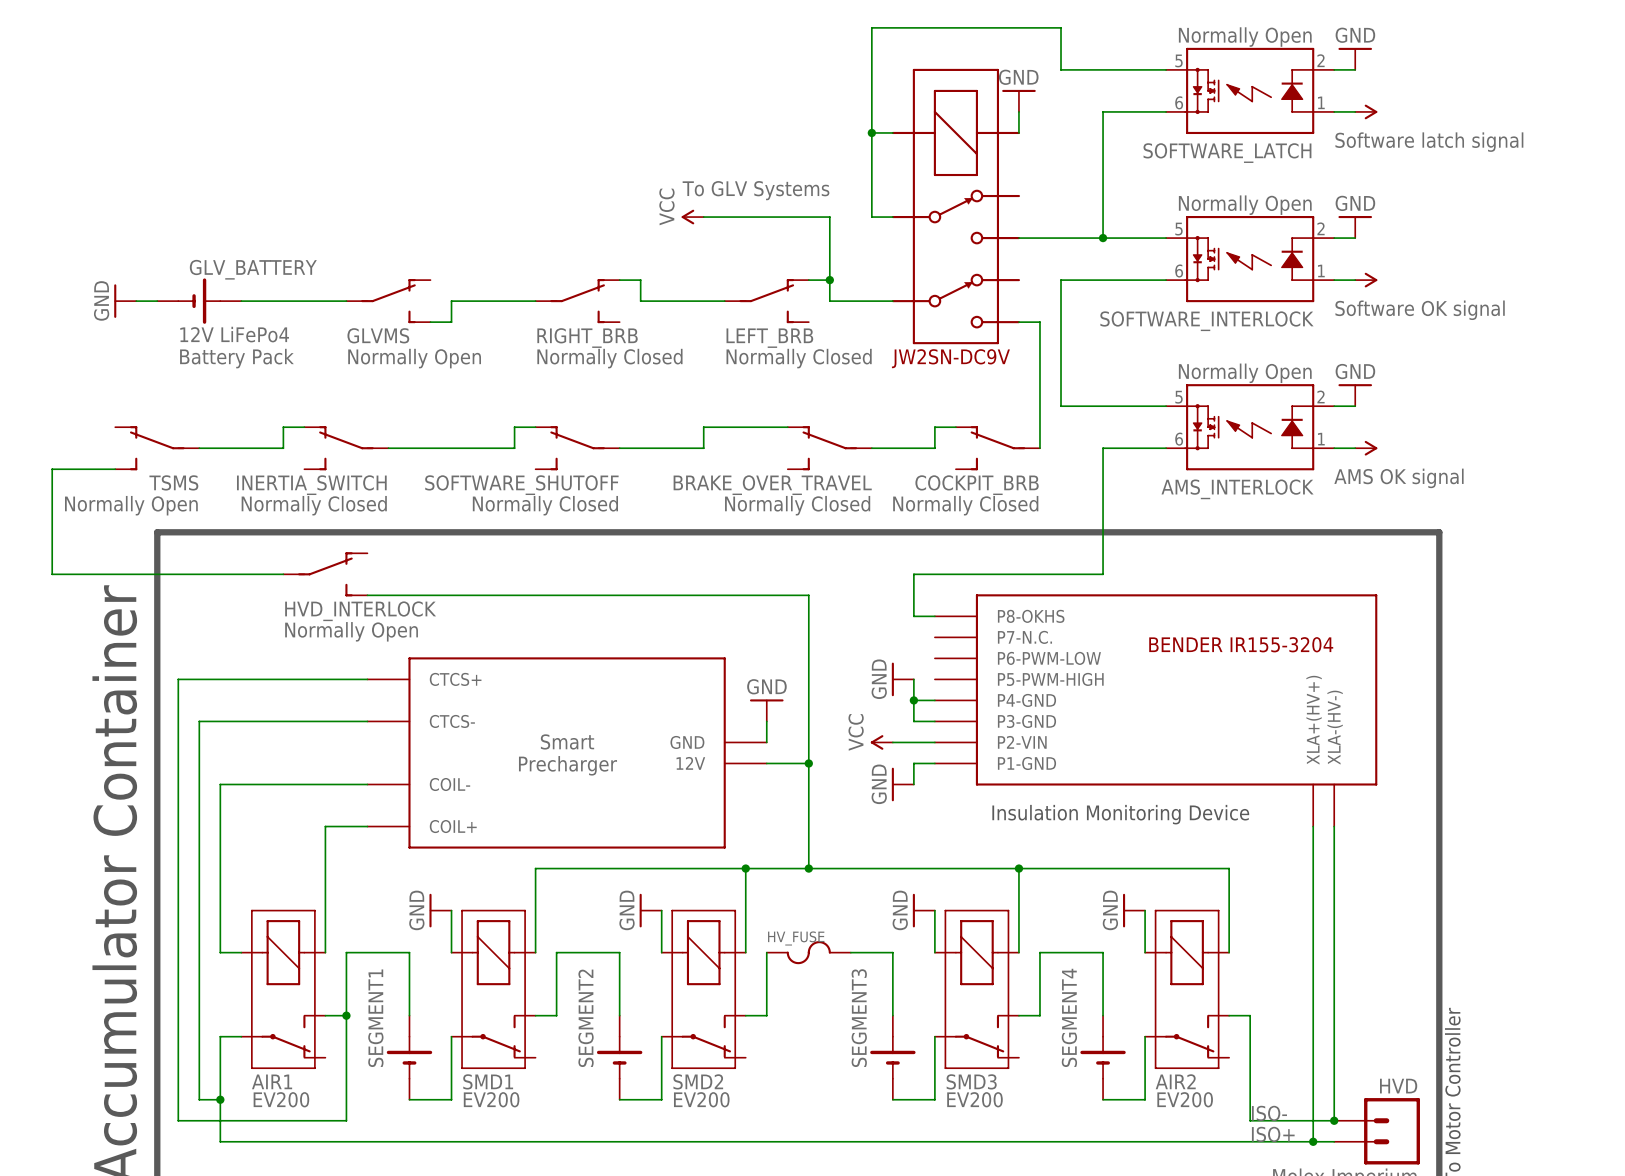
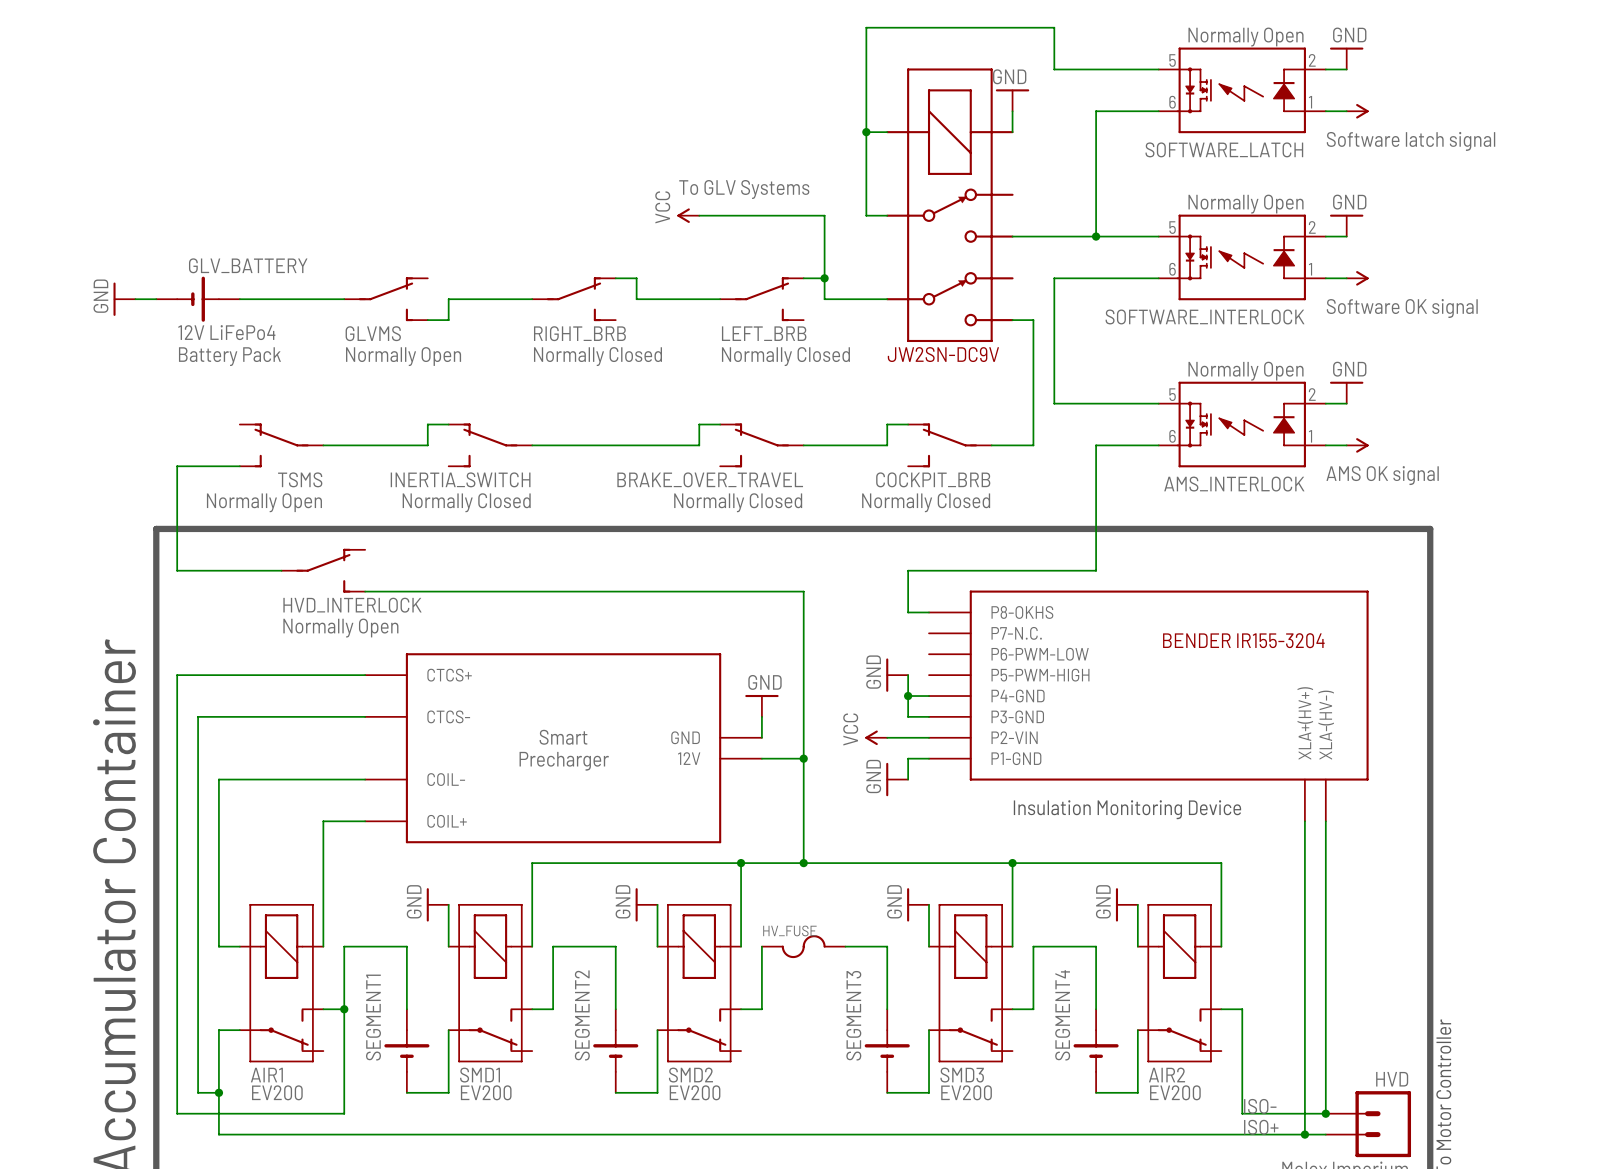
wire: (304, 427) (283, 427) (283, 448) (199, 448) -> none
wire: (535, 427) (514, 427) (514, 448) (430, 448) -> (448, 424) (427, 424) (427, 445)
wire: (724, 427) (787, 427) -> (803, 445) (866, 445)
wire: (955, 427) (934, 427) (934, 448) (892, 448) -> (908, 424) (887, 424) (887, 445)
TSMS position: (157, 448) -> (281, 445)
wire: none -> (323, 445) (386, 445)
INERTIA_SWITCH position: (346, 448) -> (490, 445)
wire: none -> (532, 445) (615, 445)
SOFTWARE_SHUTOFF: Normally Closed (577, 448) -> none
BRAKE_OVER_TRAVEL position: (829, 448) -> (761, 445)
COCKPIT_BRB position: (997, 448) -> (949, 445)
wire: (115, 469) (52, 469) (52, 574) (178, 574) -> (239, 466) (177, 466) (177, 570)

